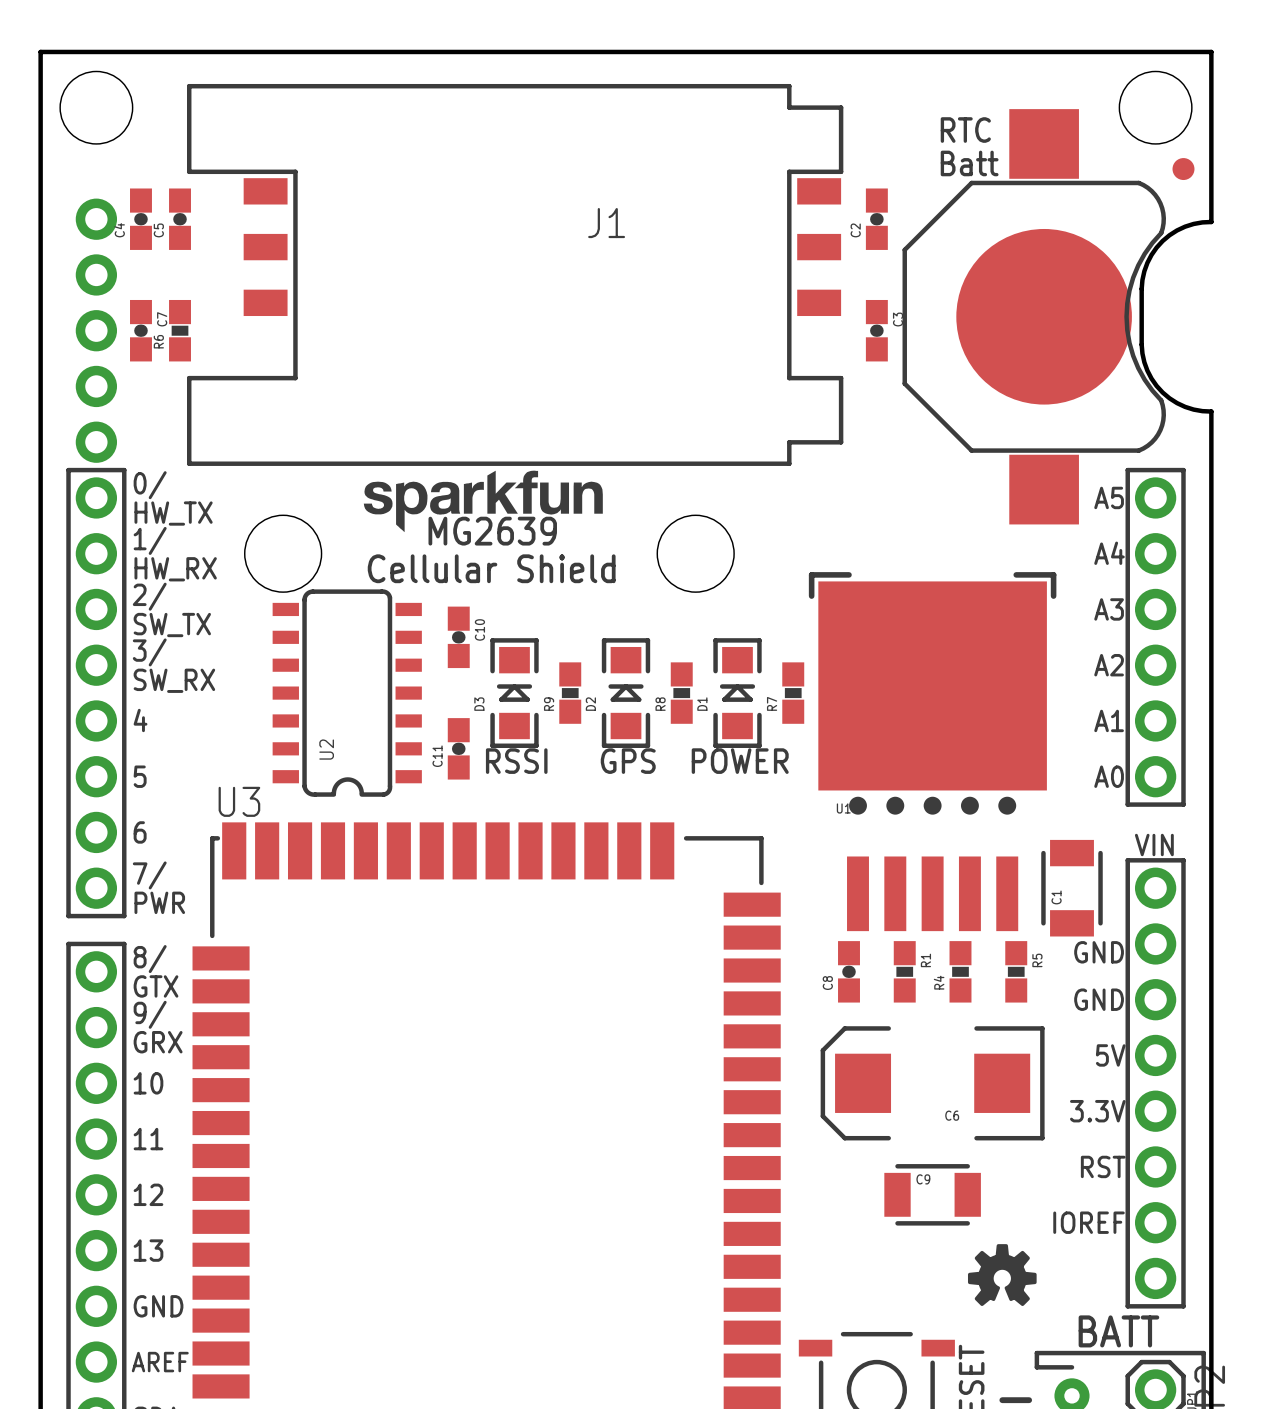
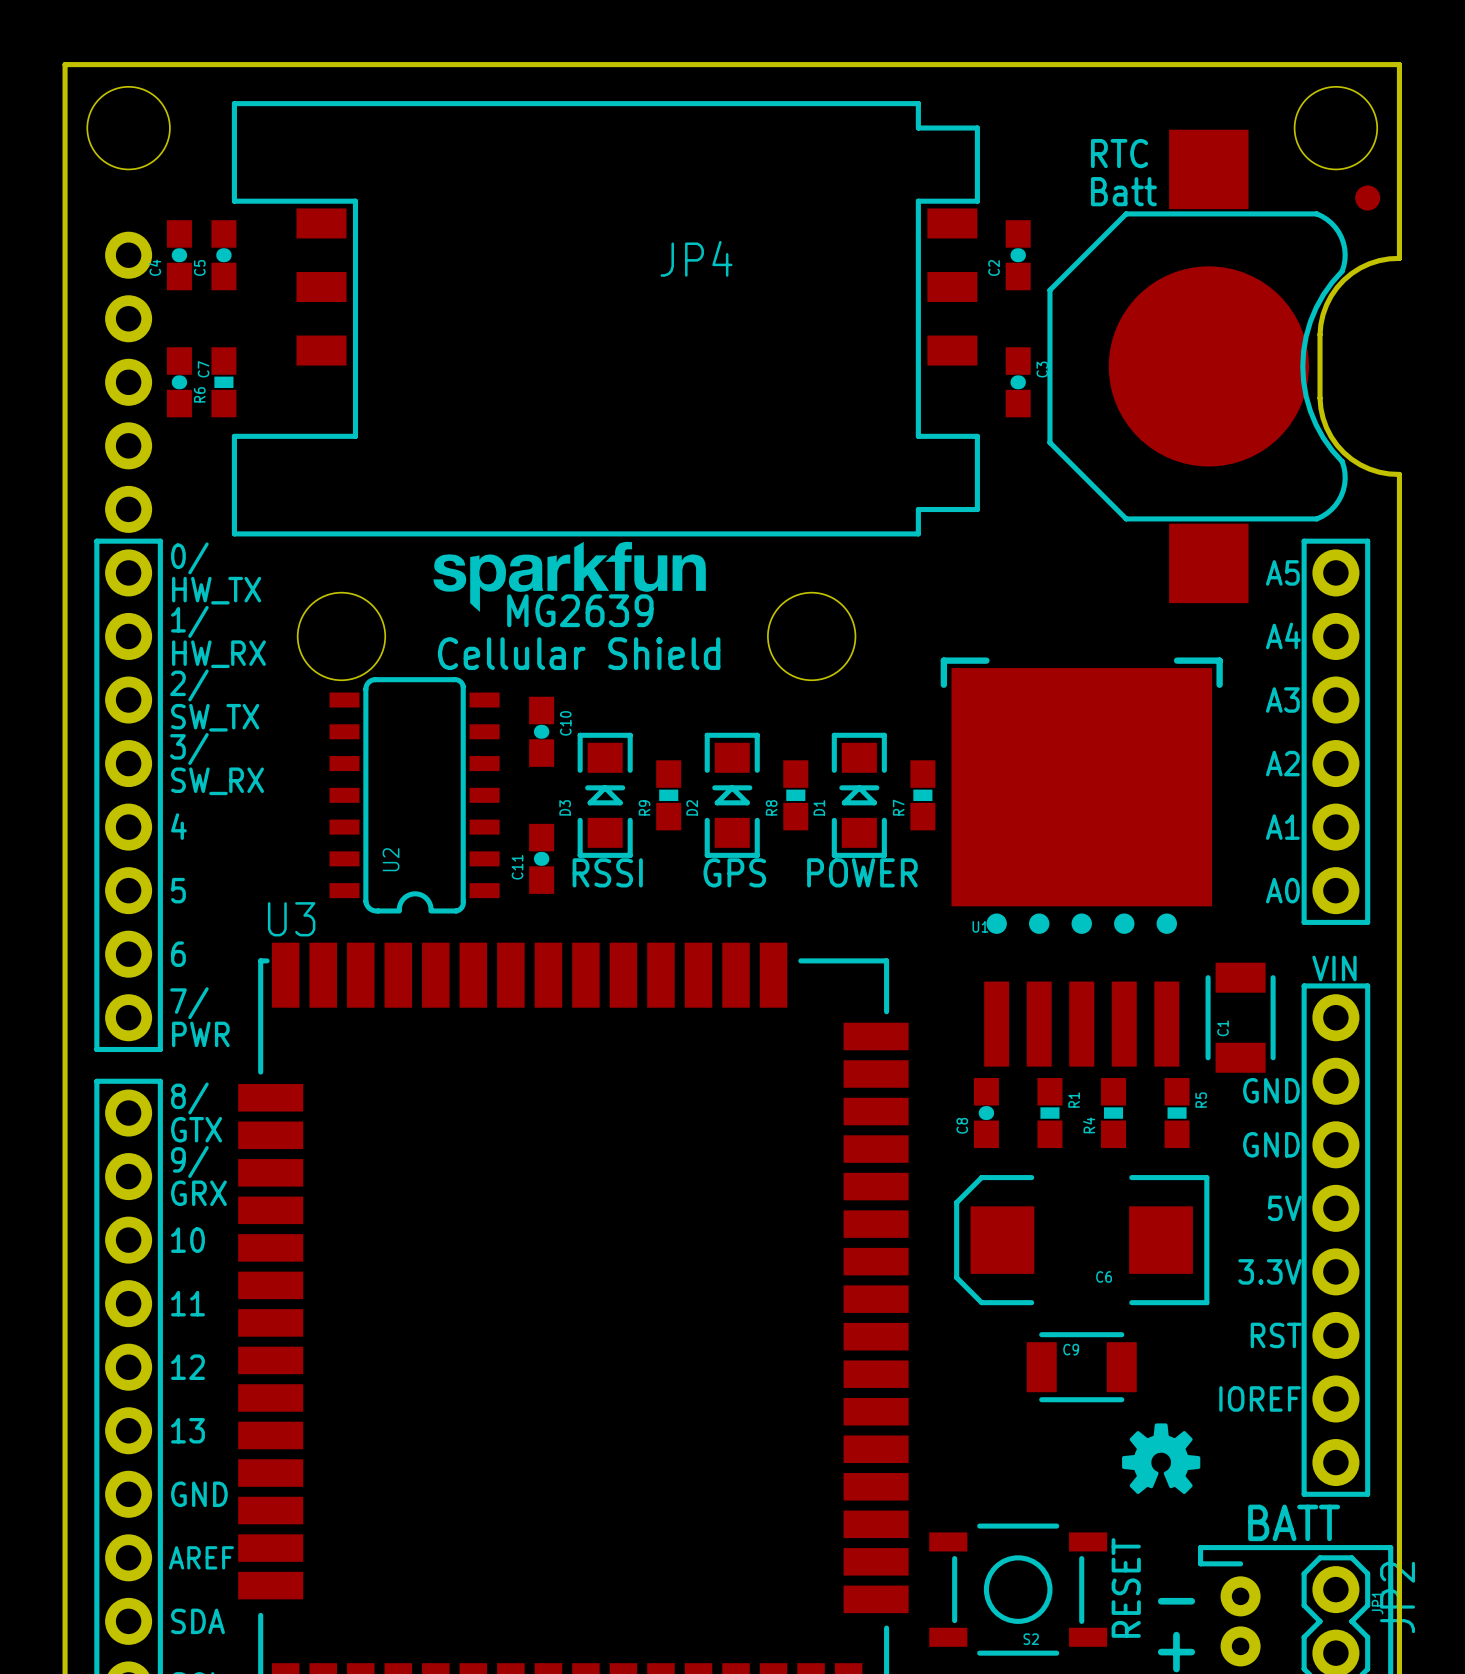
J1 name: J1 (606, 223) -> JP4 (696, 258)

